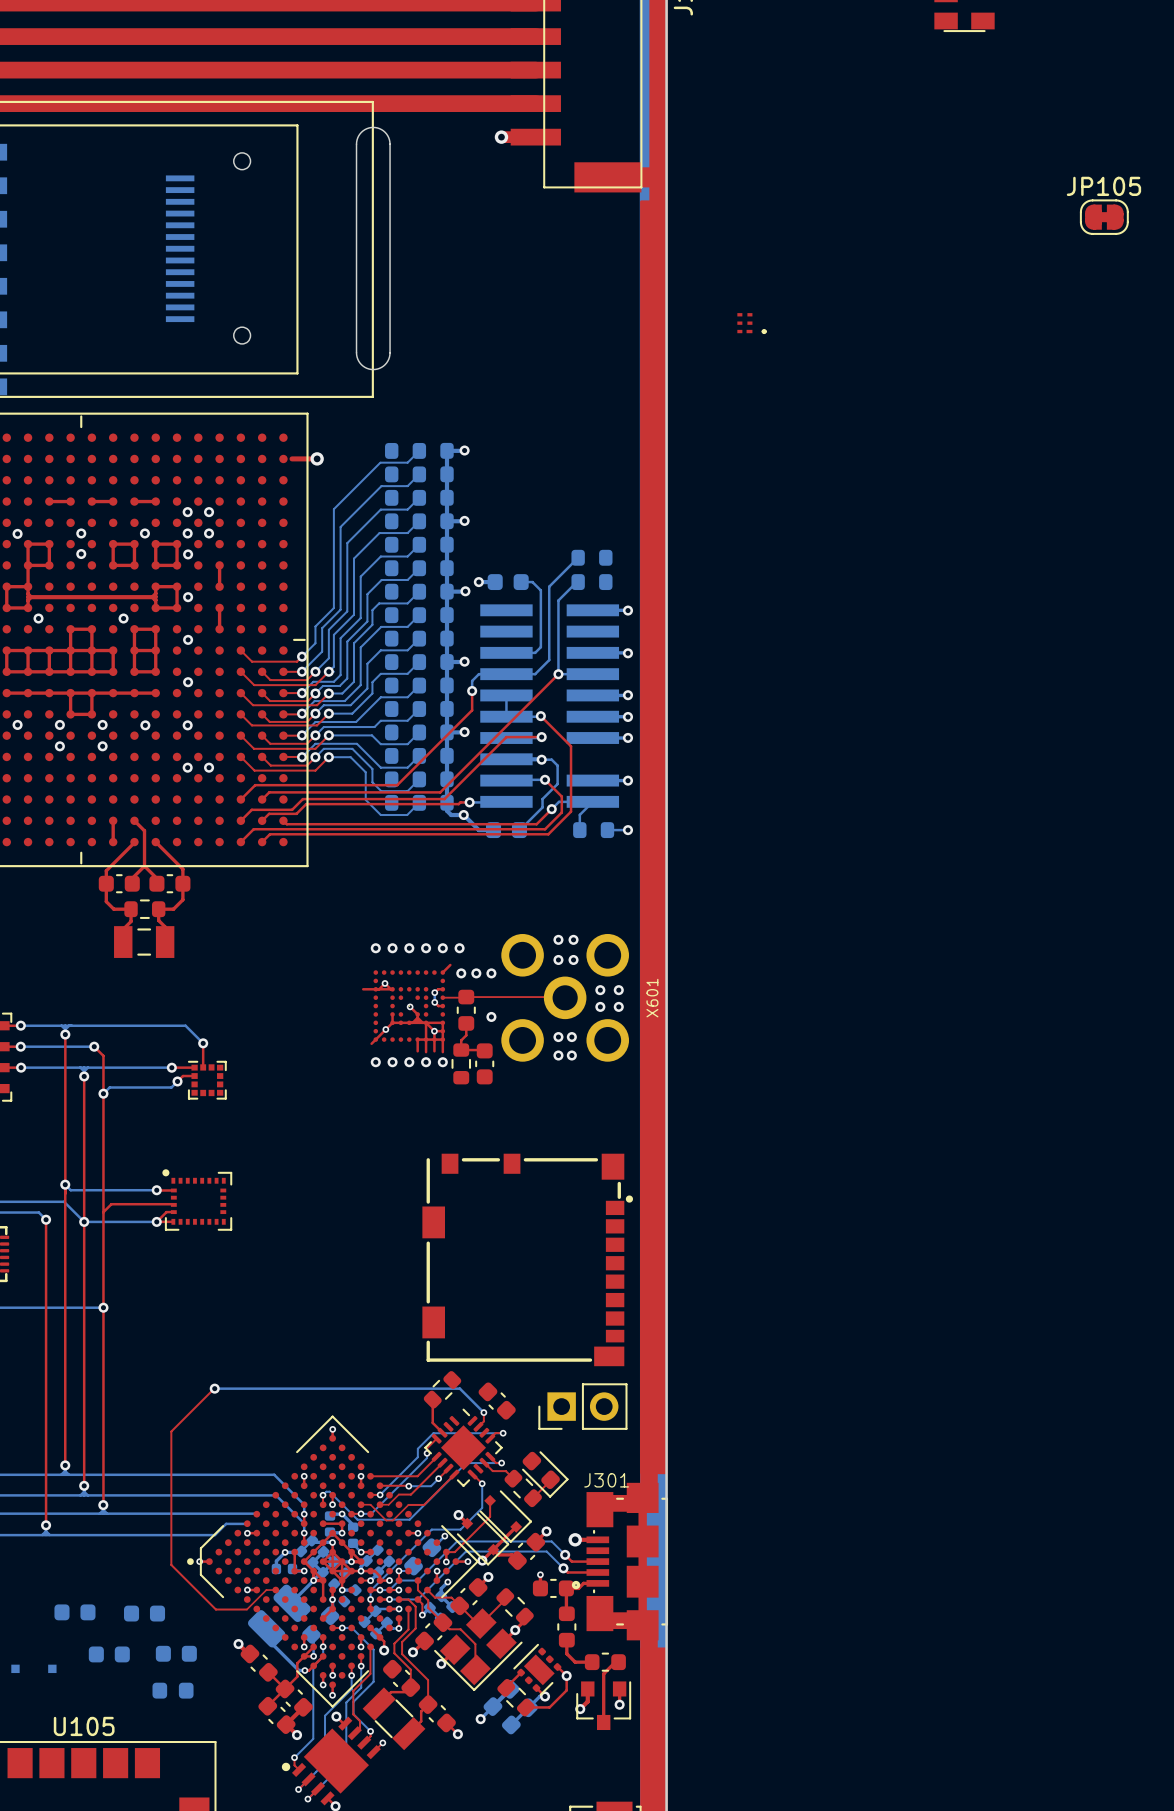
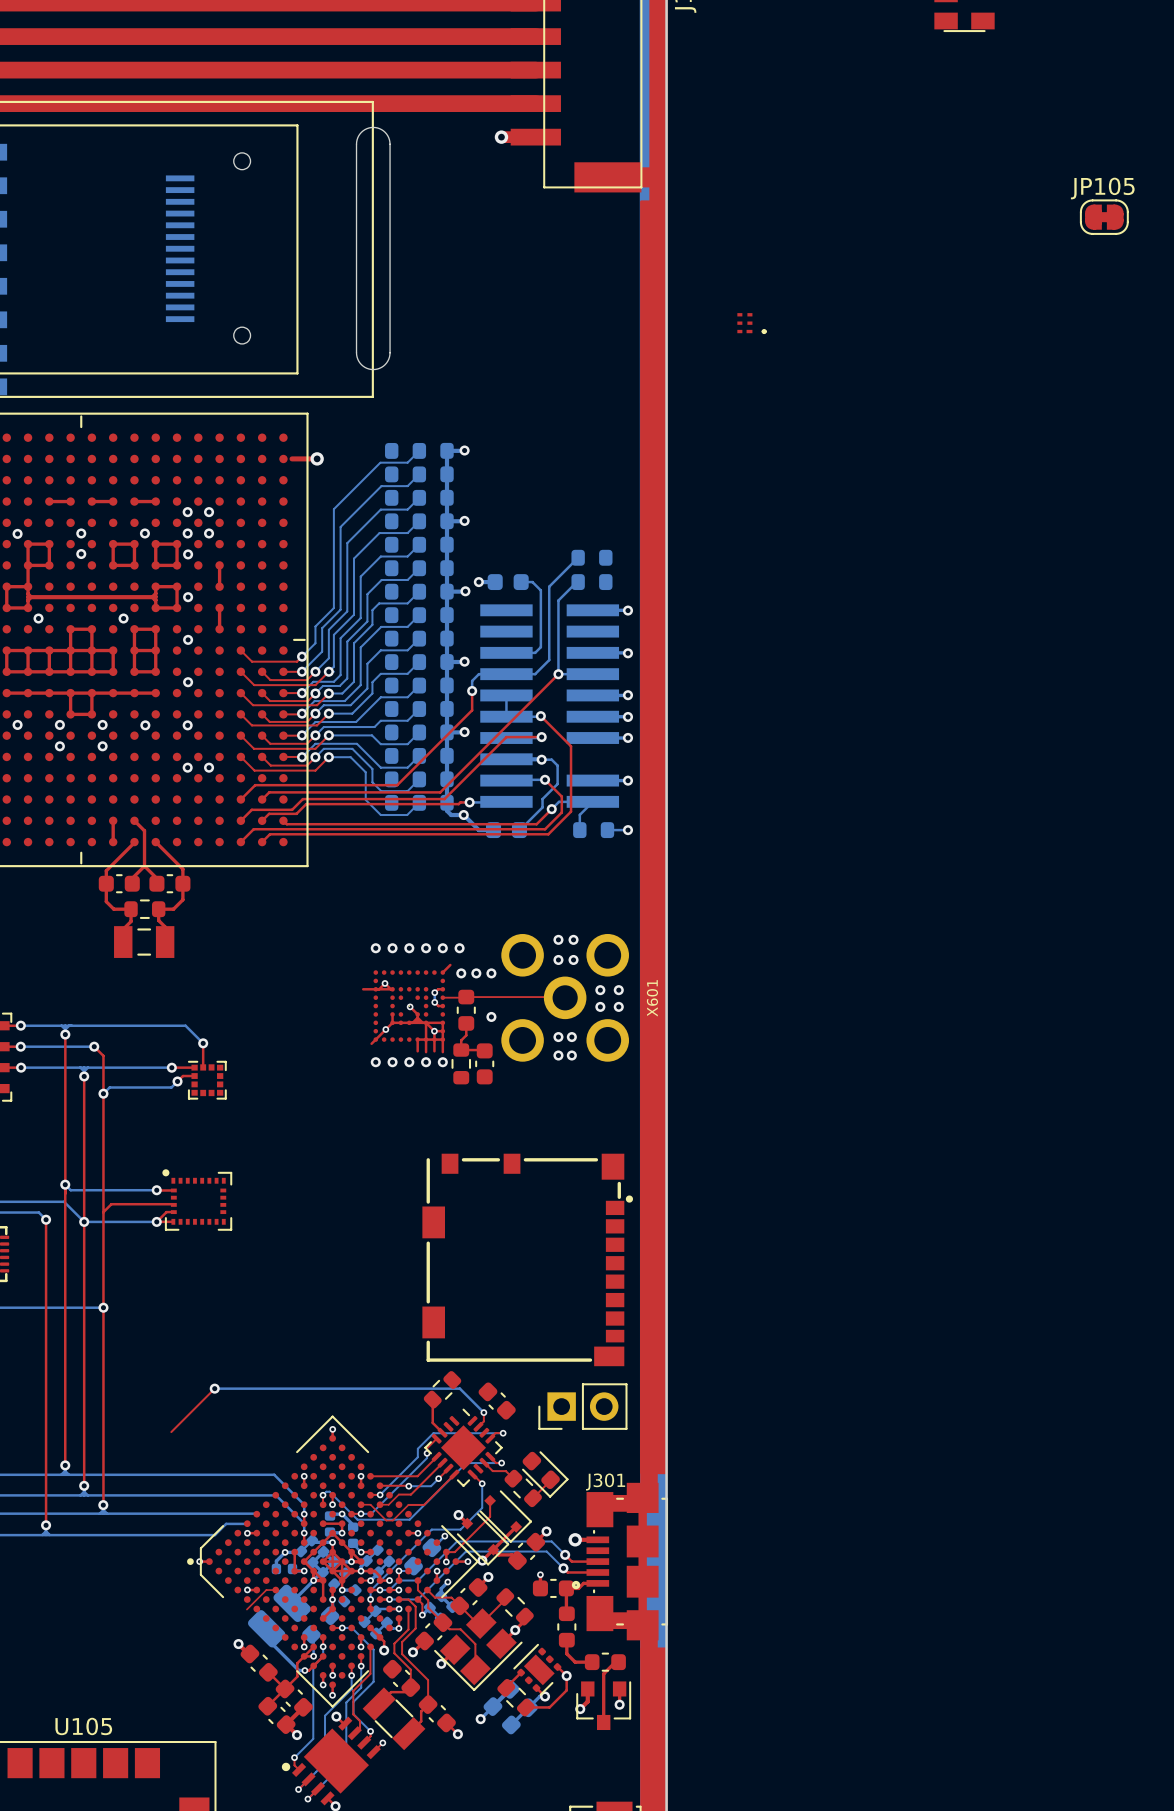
top track: (214, 1388) (171, 1431) (171, 1564) (215, 1609) (246, 1609) -> (214, 1388) (171, 1432)
part: (74, 1612) -> none
part: (144, 1613) -> none
part: (176, 1653) -> none
part: (109, 1654) -> none
part: (33, 1668) -> none
part: (173, 1690) -> none

